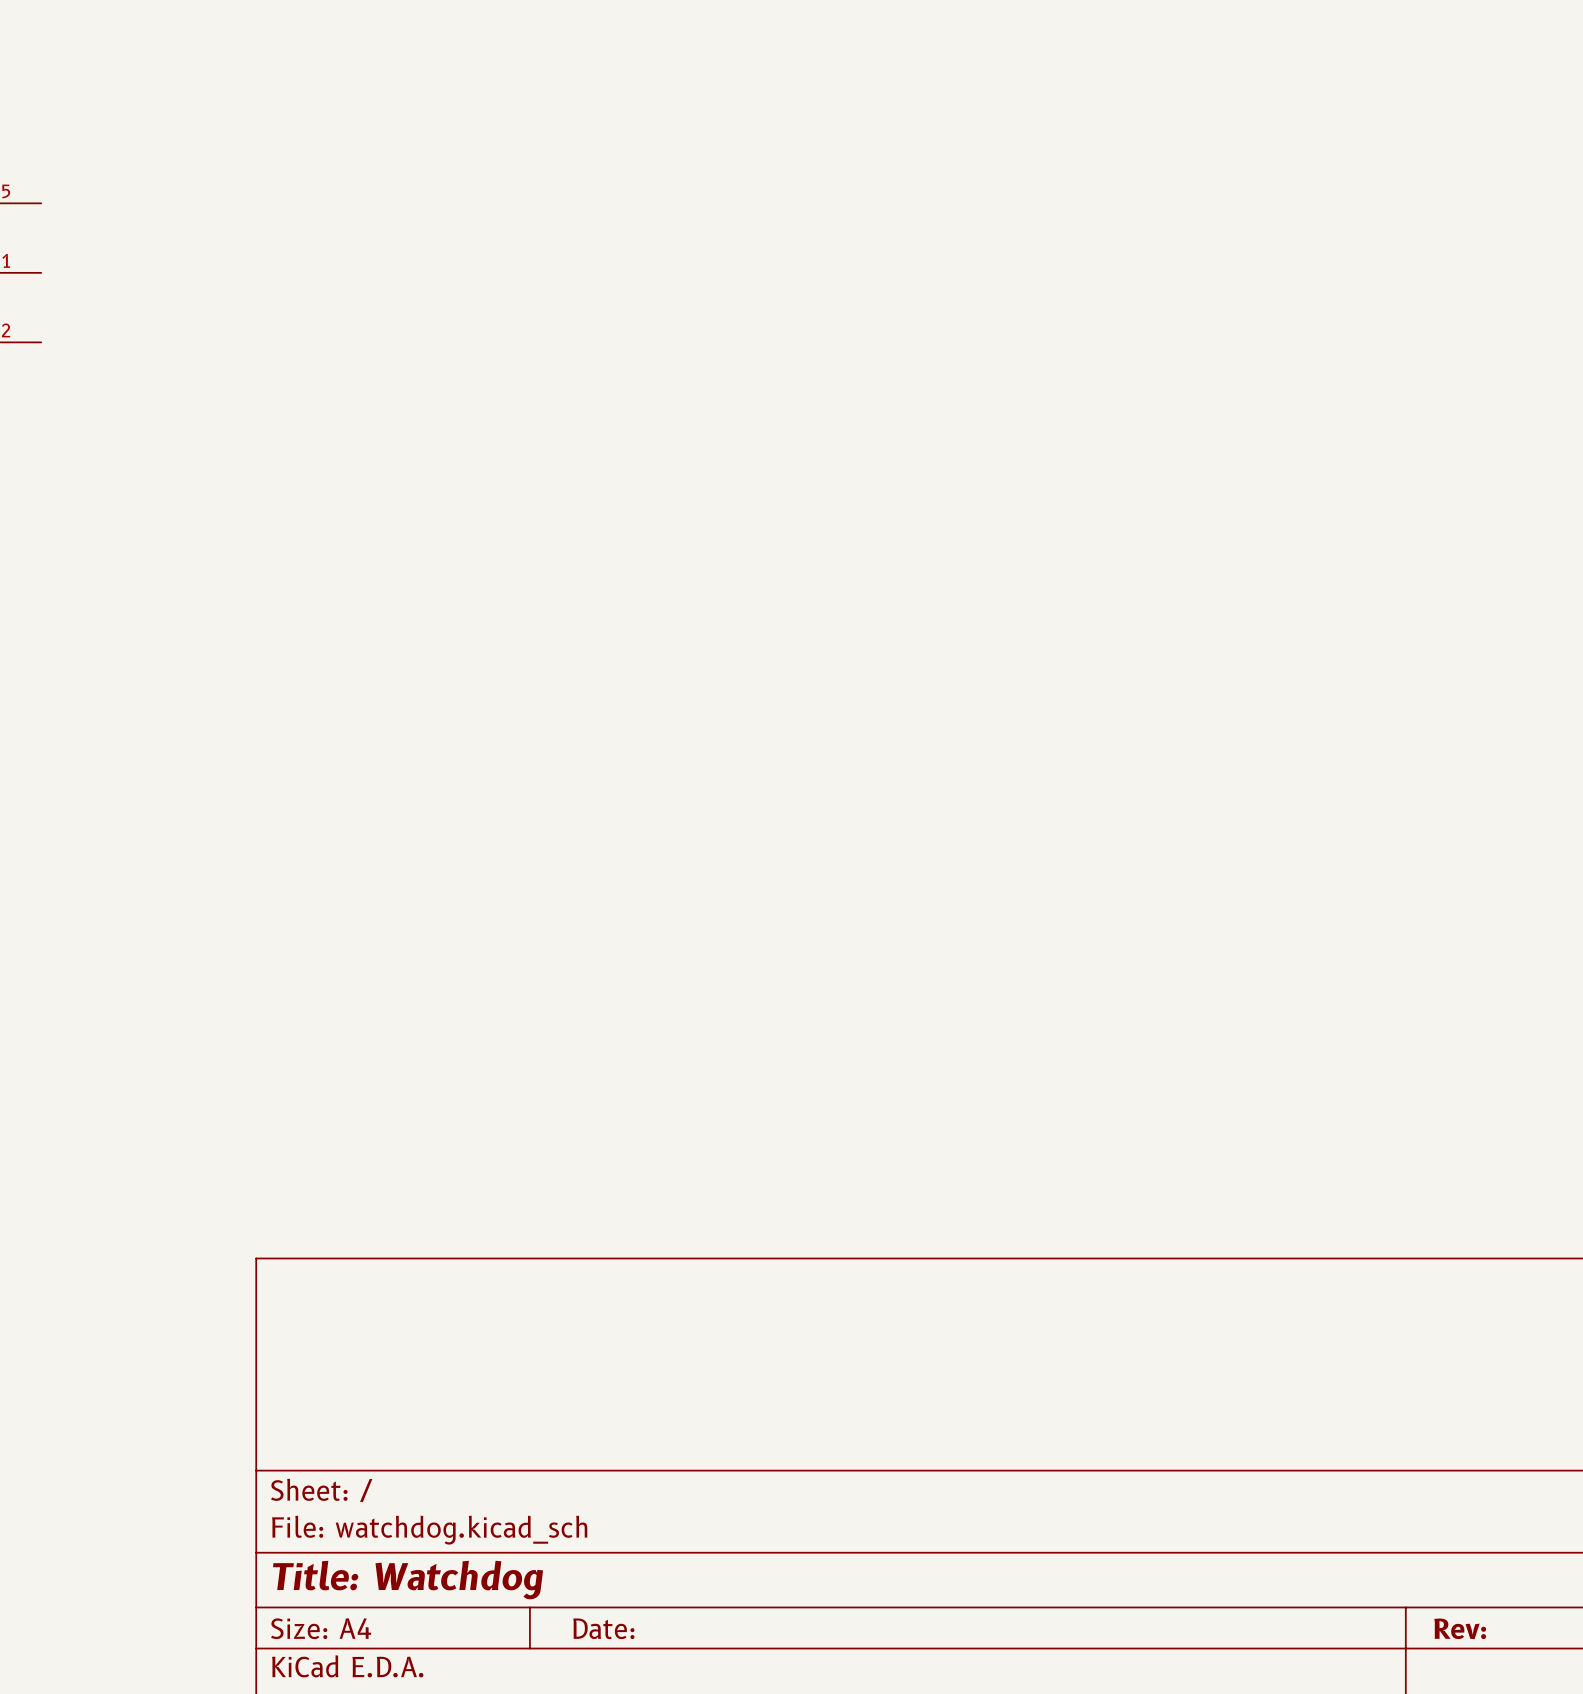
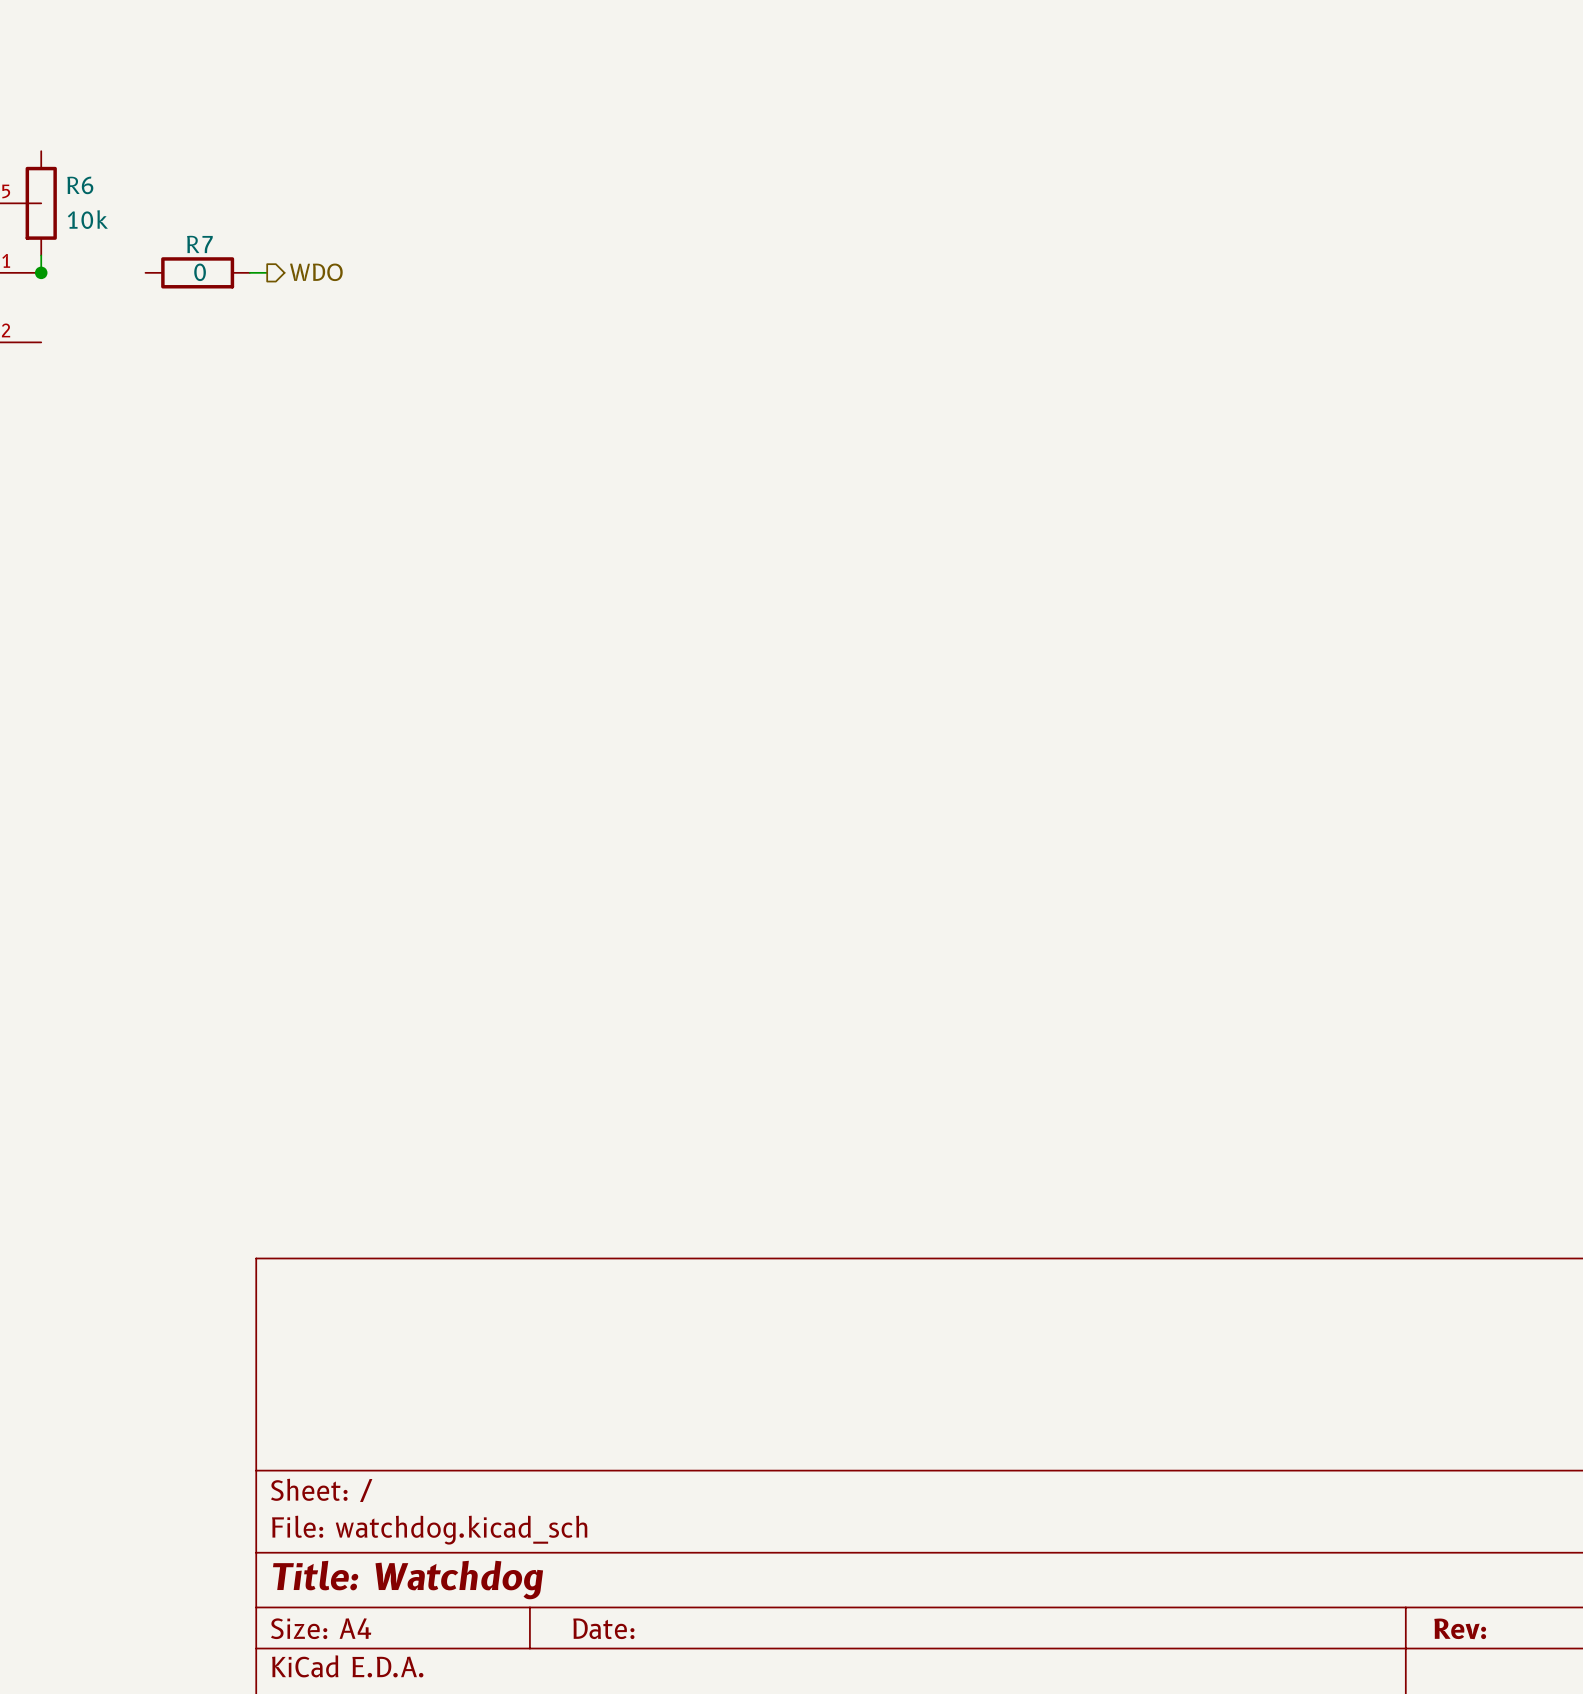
R6: none -> 10k (41, 203)
wire: none -> (41, 255) (41, 272)
junction: none -> (41, 272)
R7: none -> 0 (197, 272)
wire: none -> (249, 272) (267, 272)
hierarchical label: none -> WDO (316, 272)

